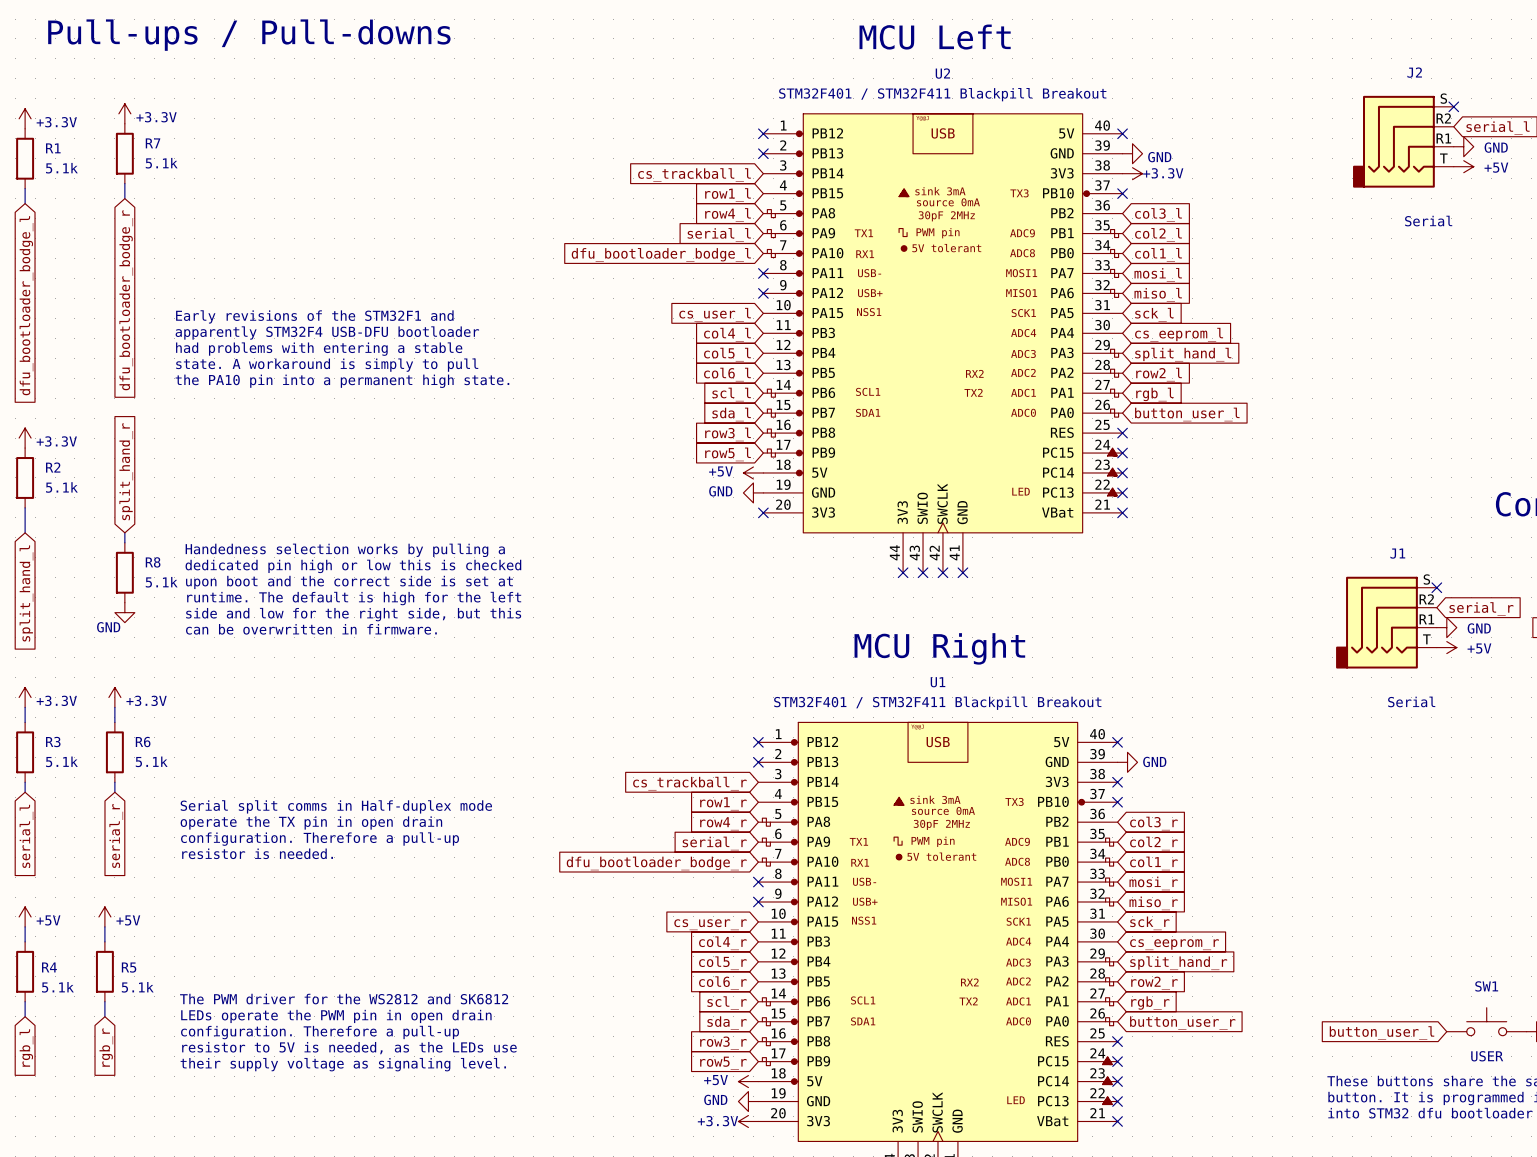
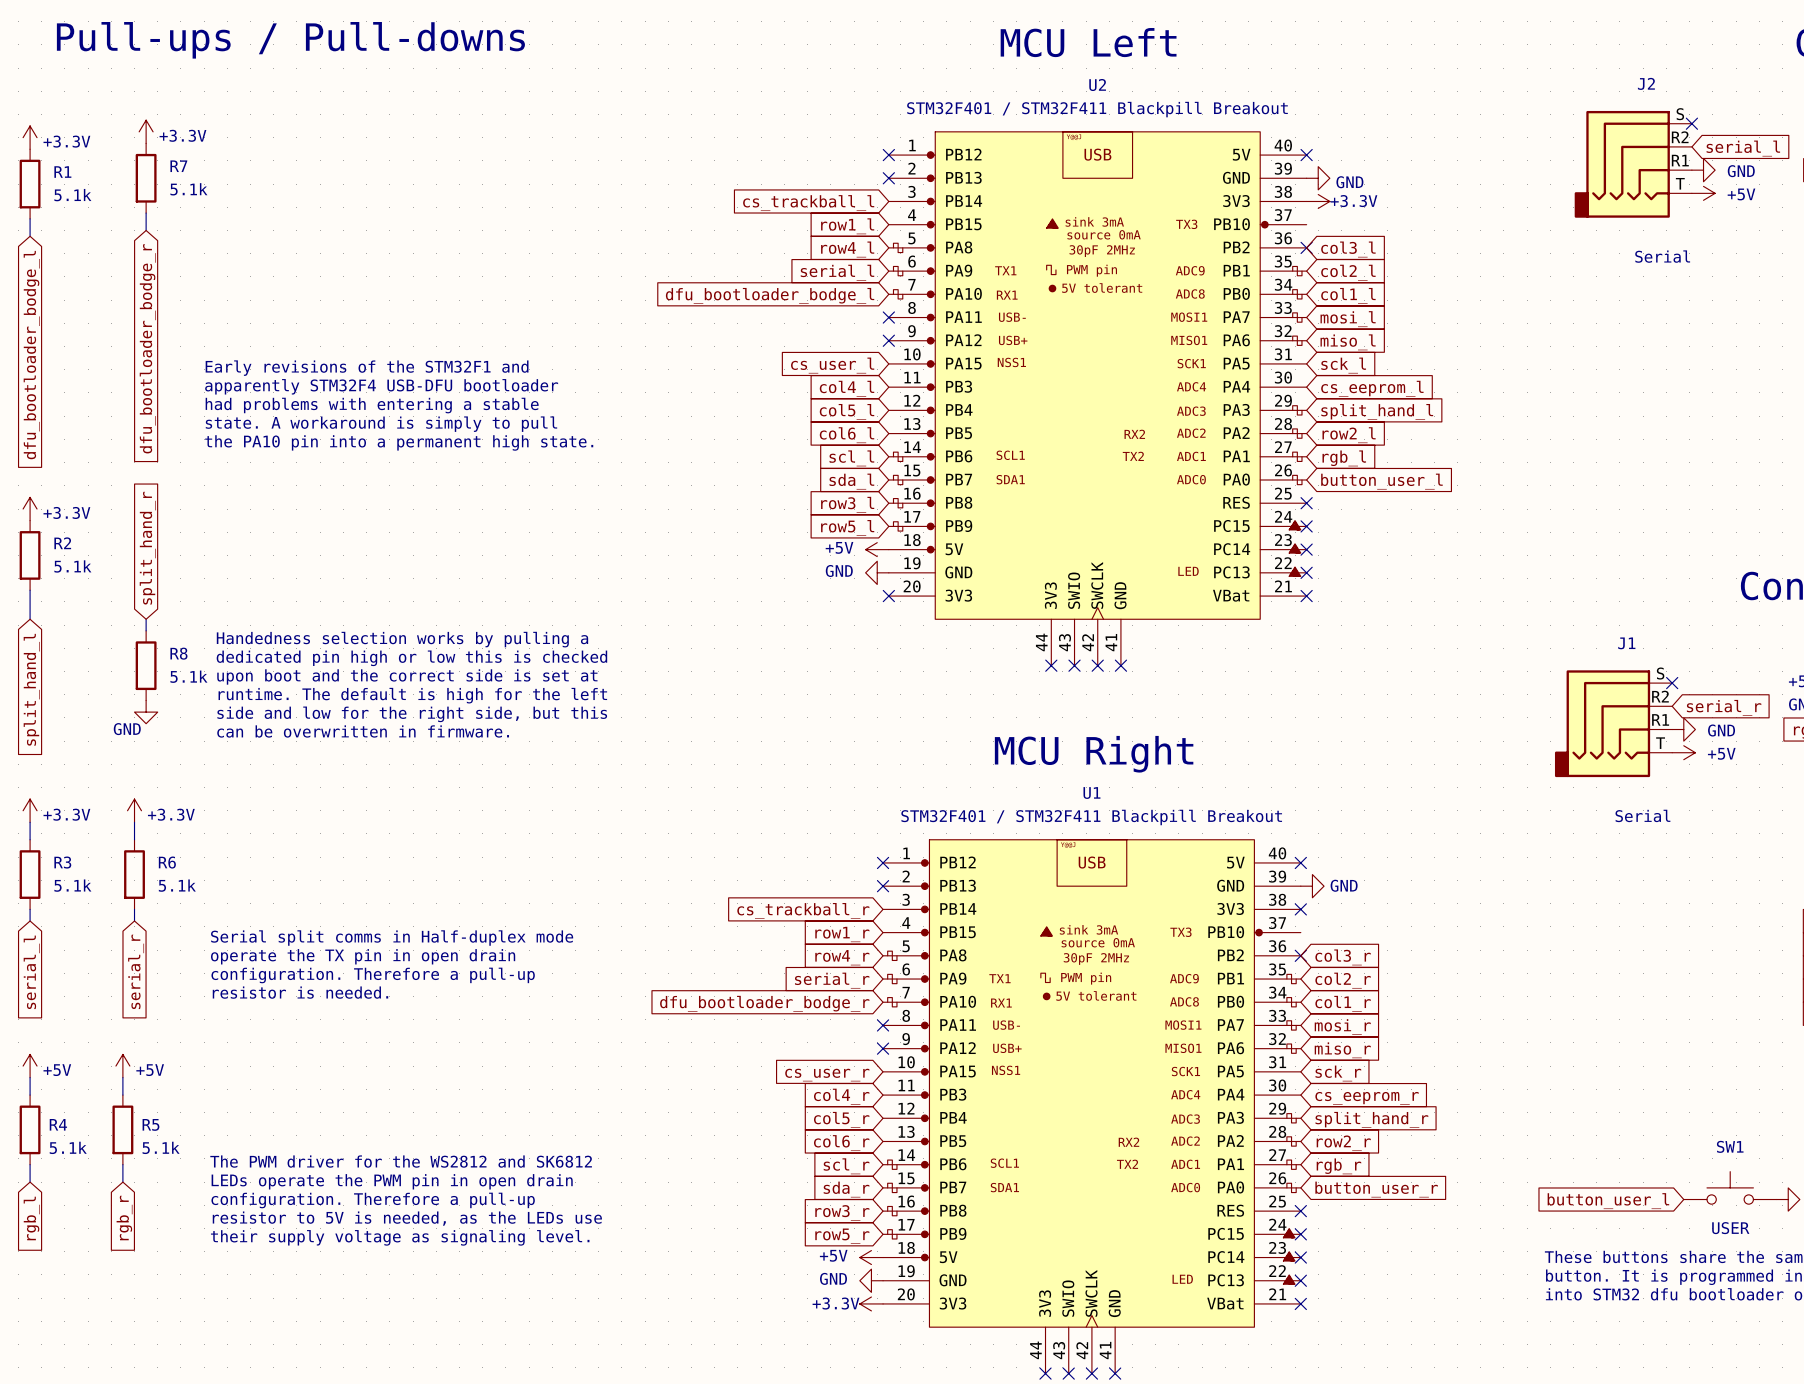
no-connect mark position: (1122, 193) -> (1306, 247)
no-connect mark position: (1117, 802) -> (1300, 955)

